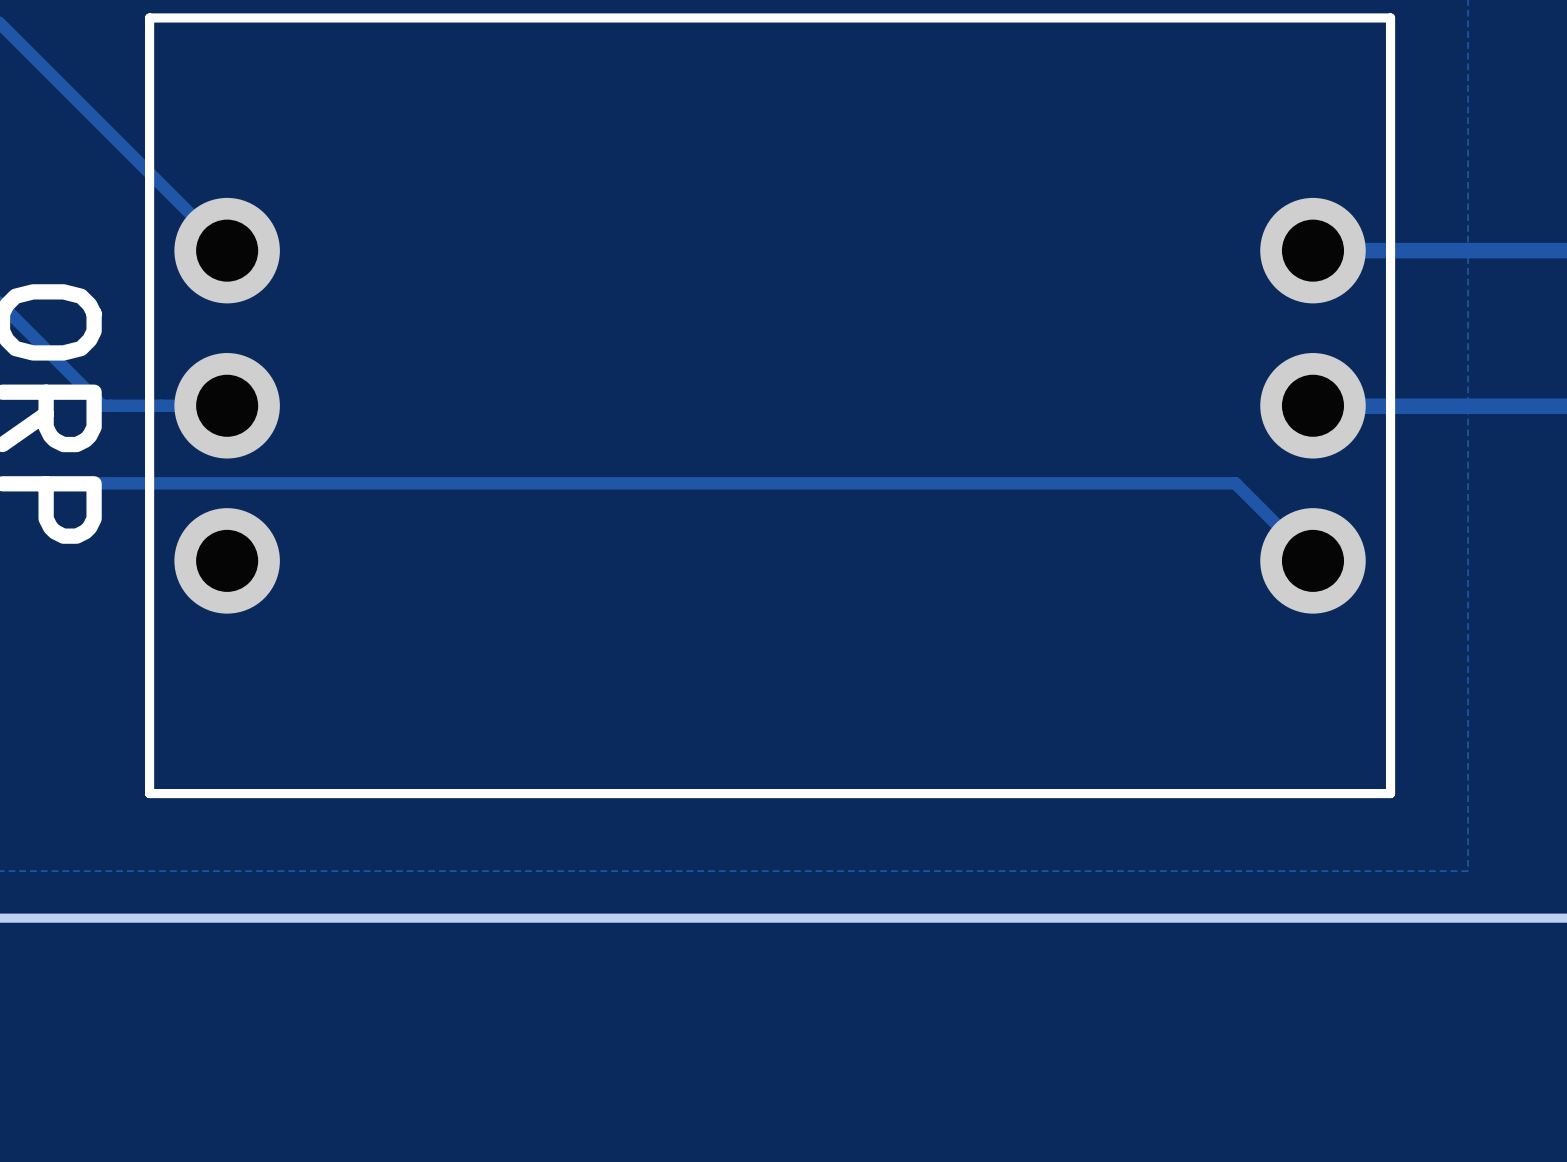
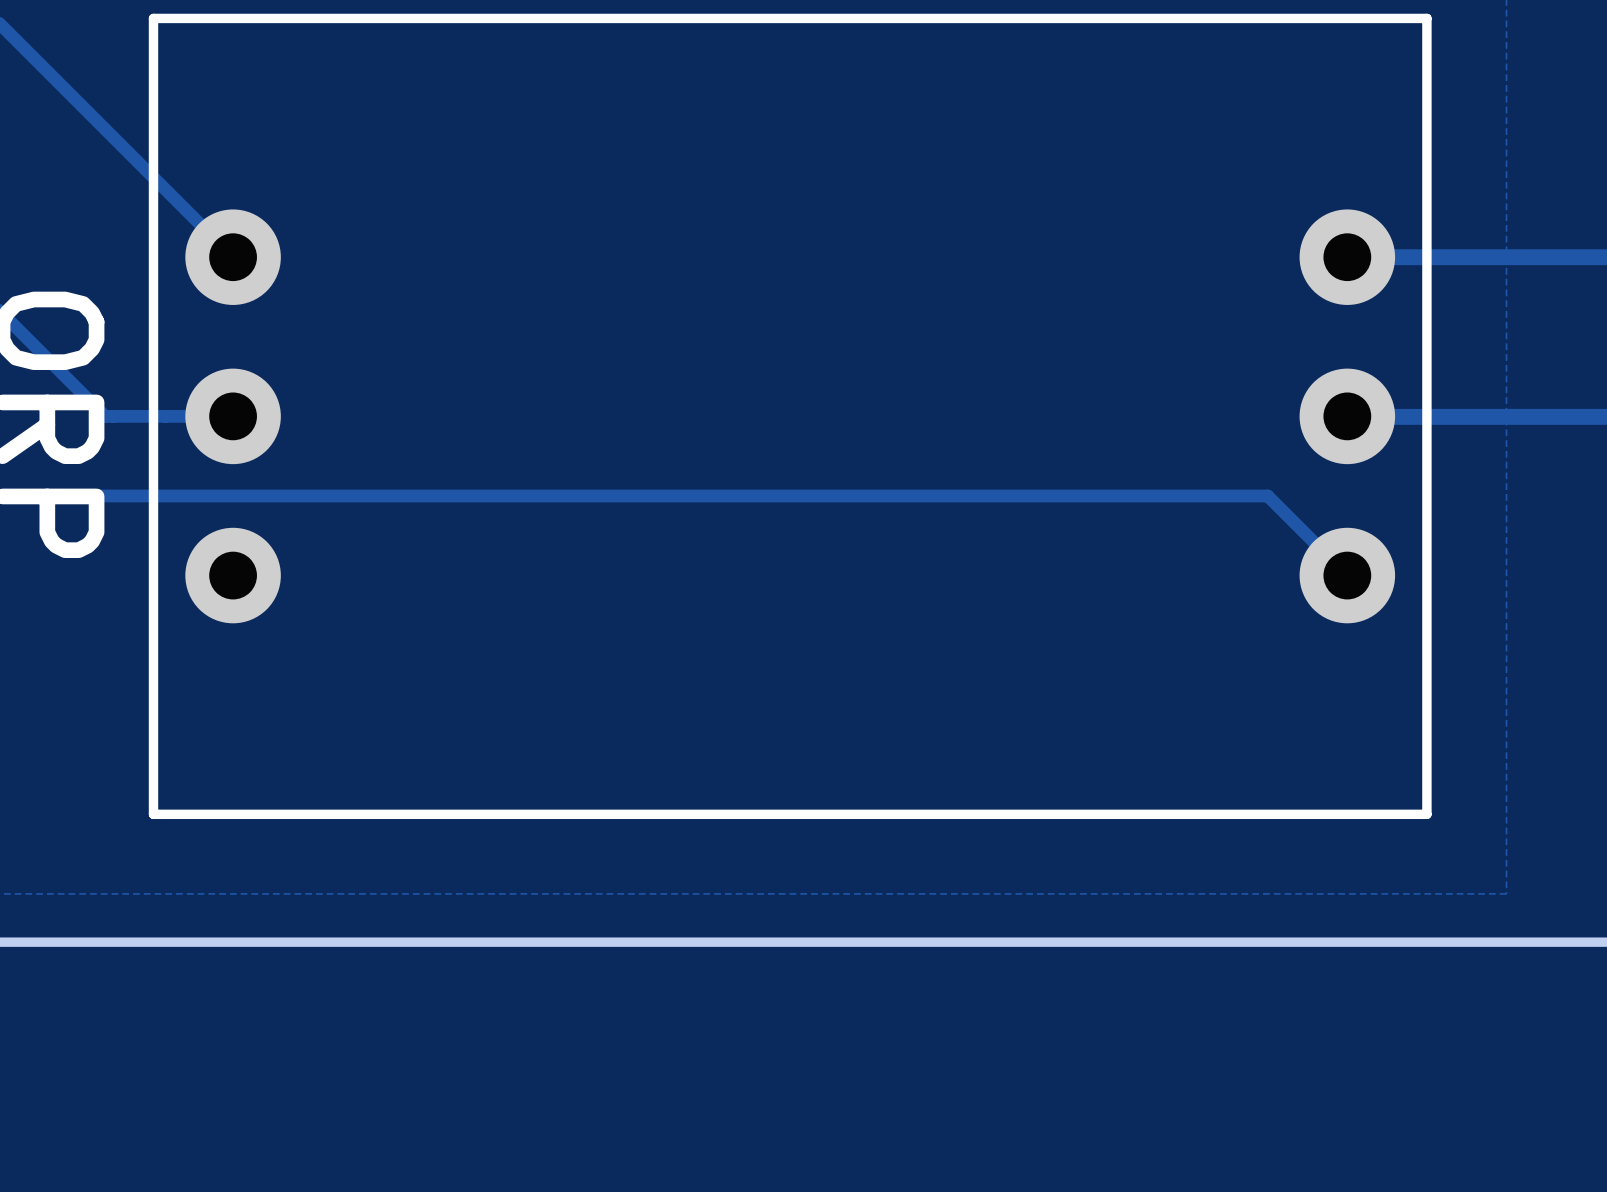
part footprint: [145, 13, 1396, 799] -> [148, 13, 1432, 820]

